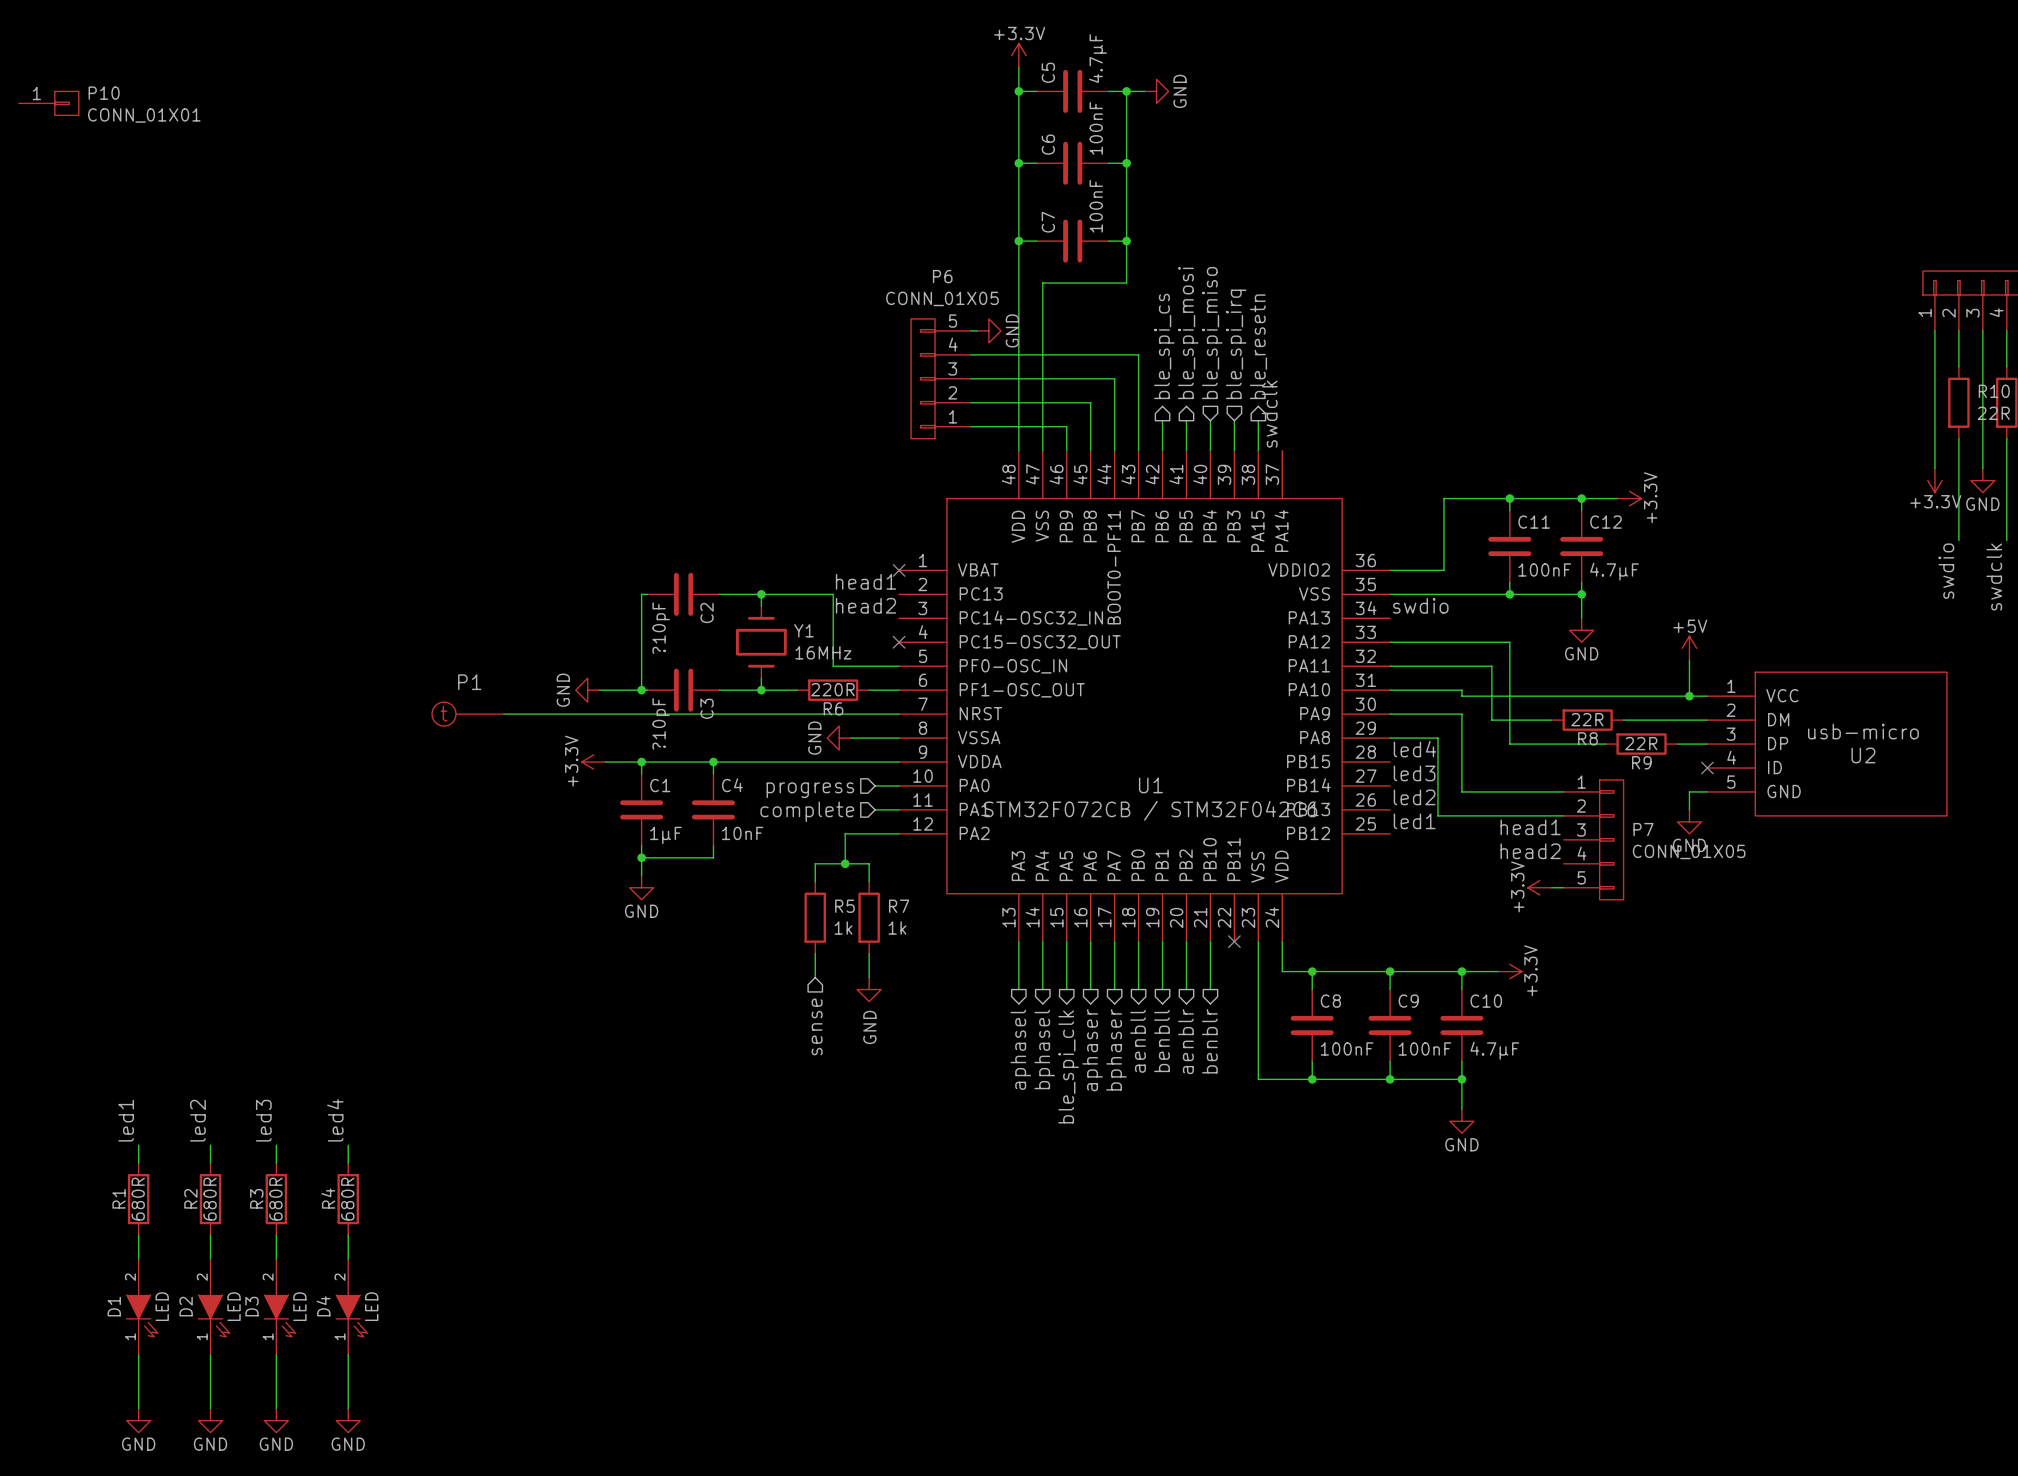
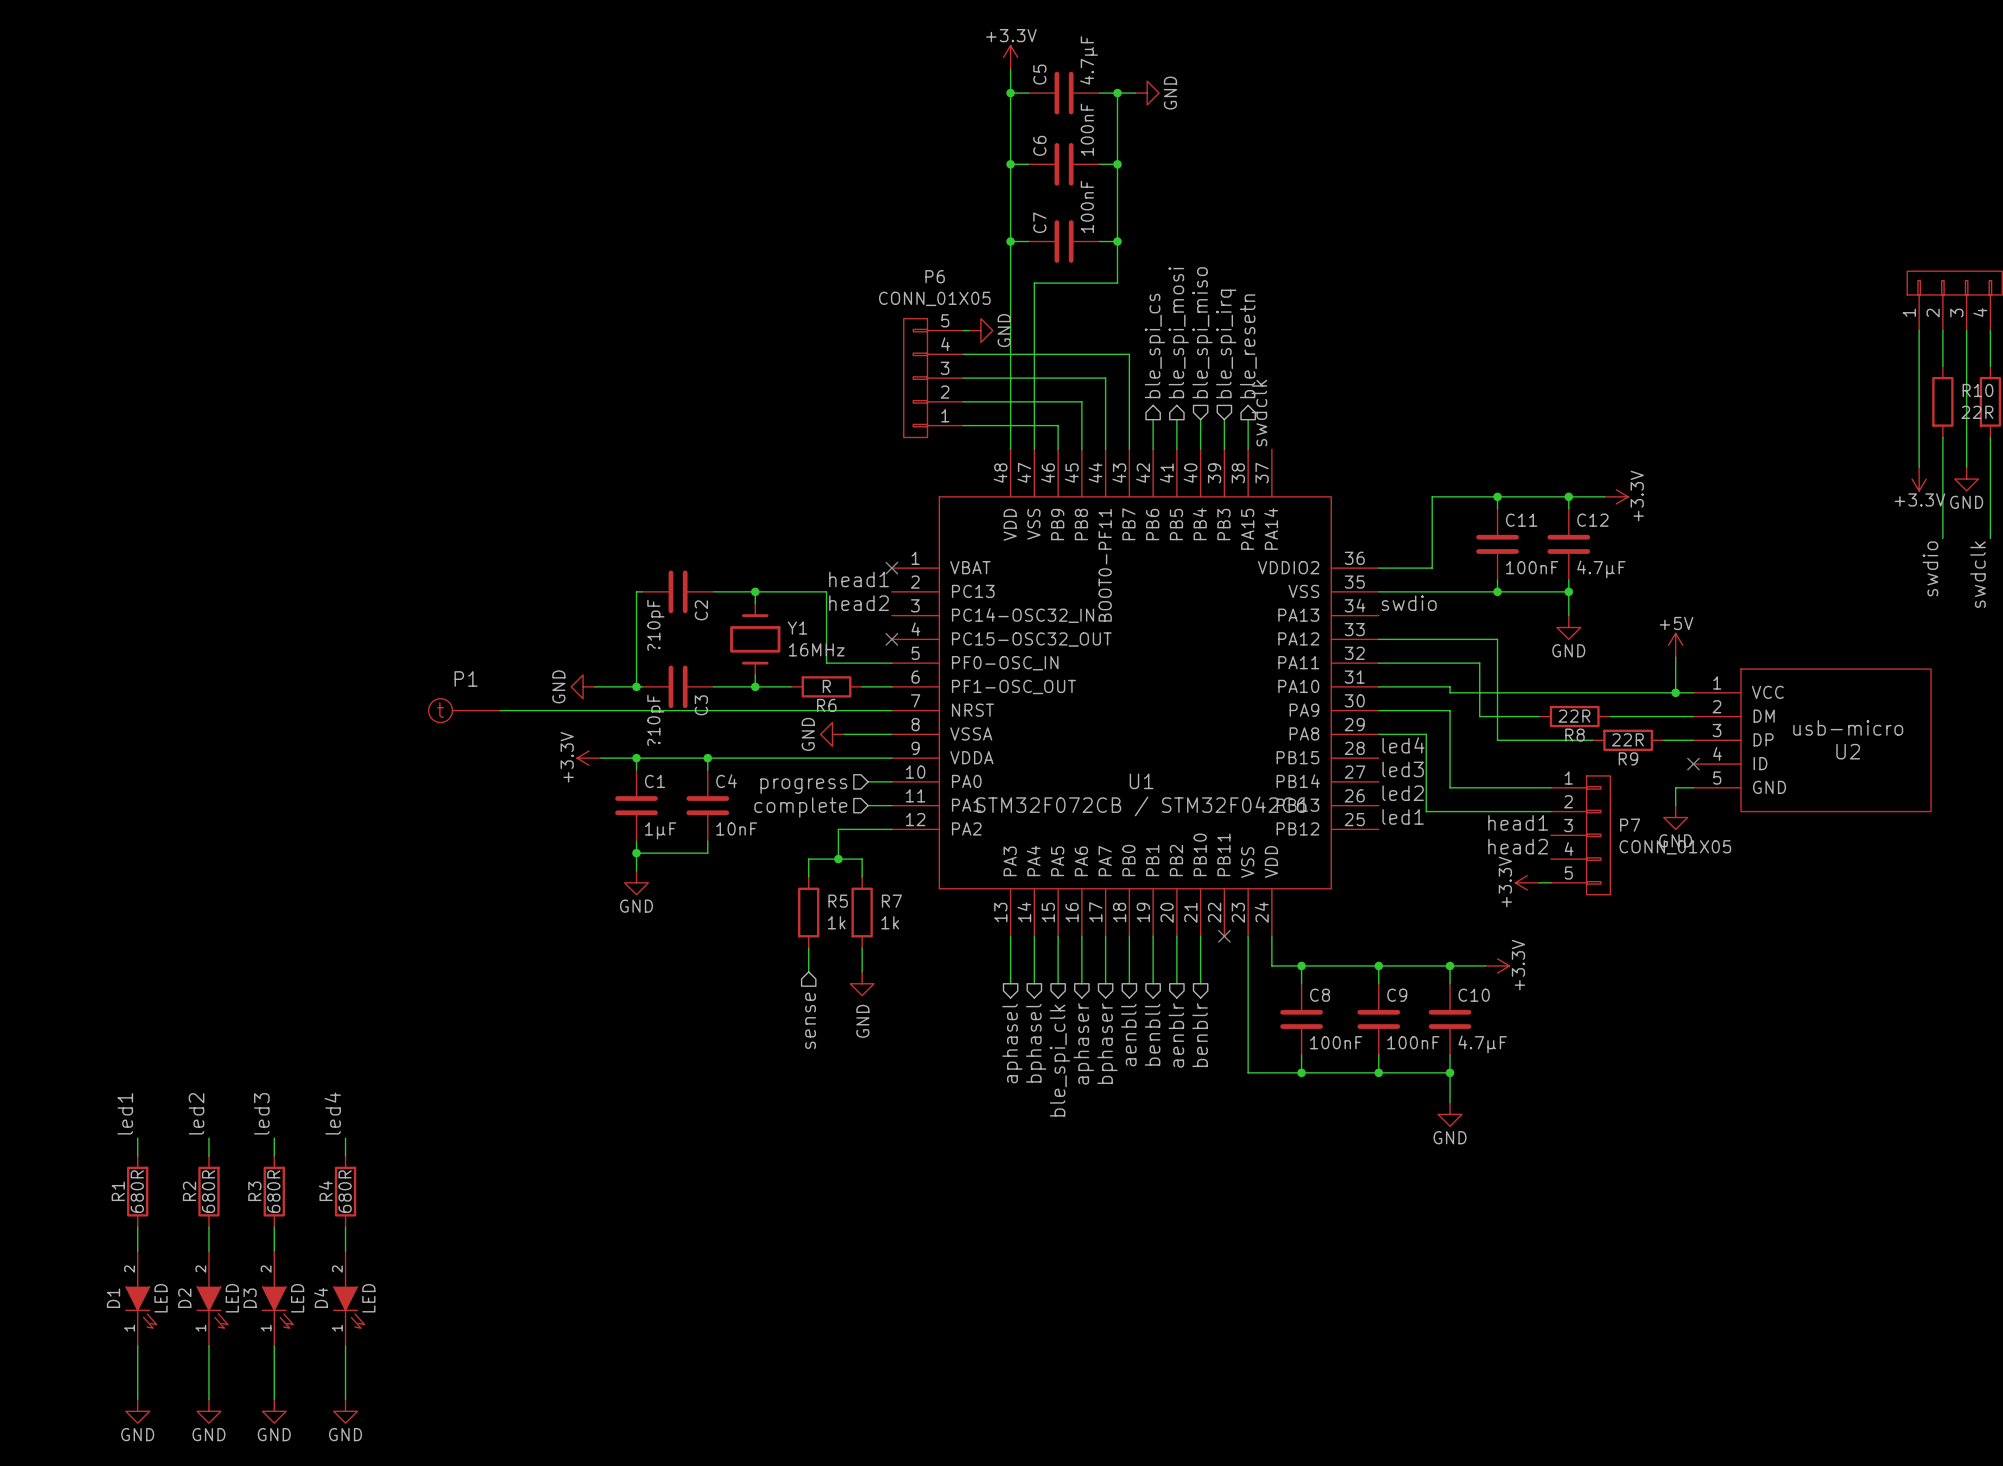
P10: CONN_01X01 (48, 103) -> none
R6 value: 220R (832, 689) -> R (826, 686)

